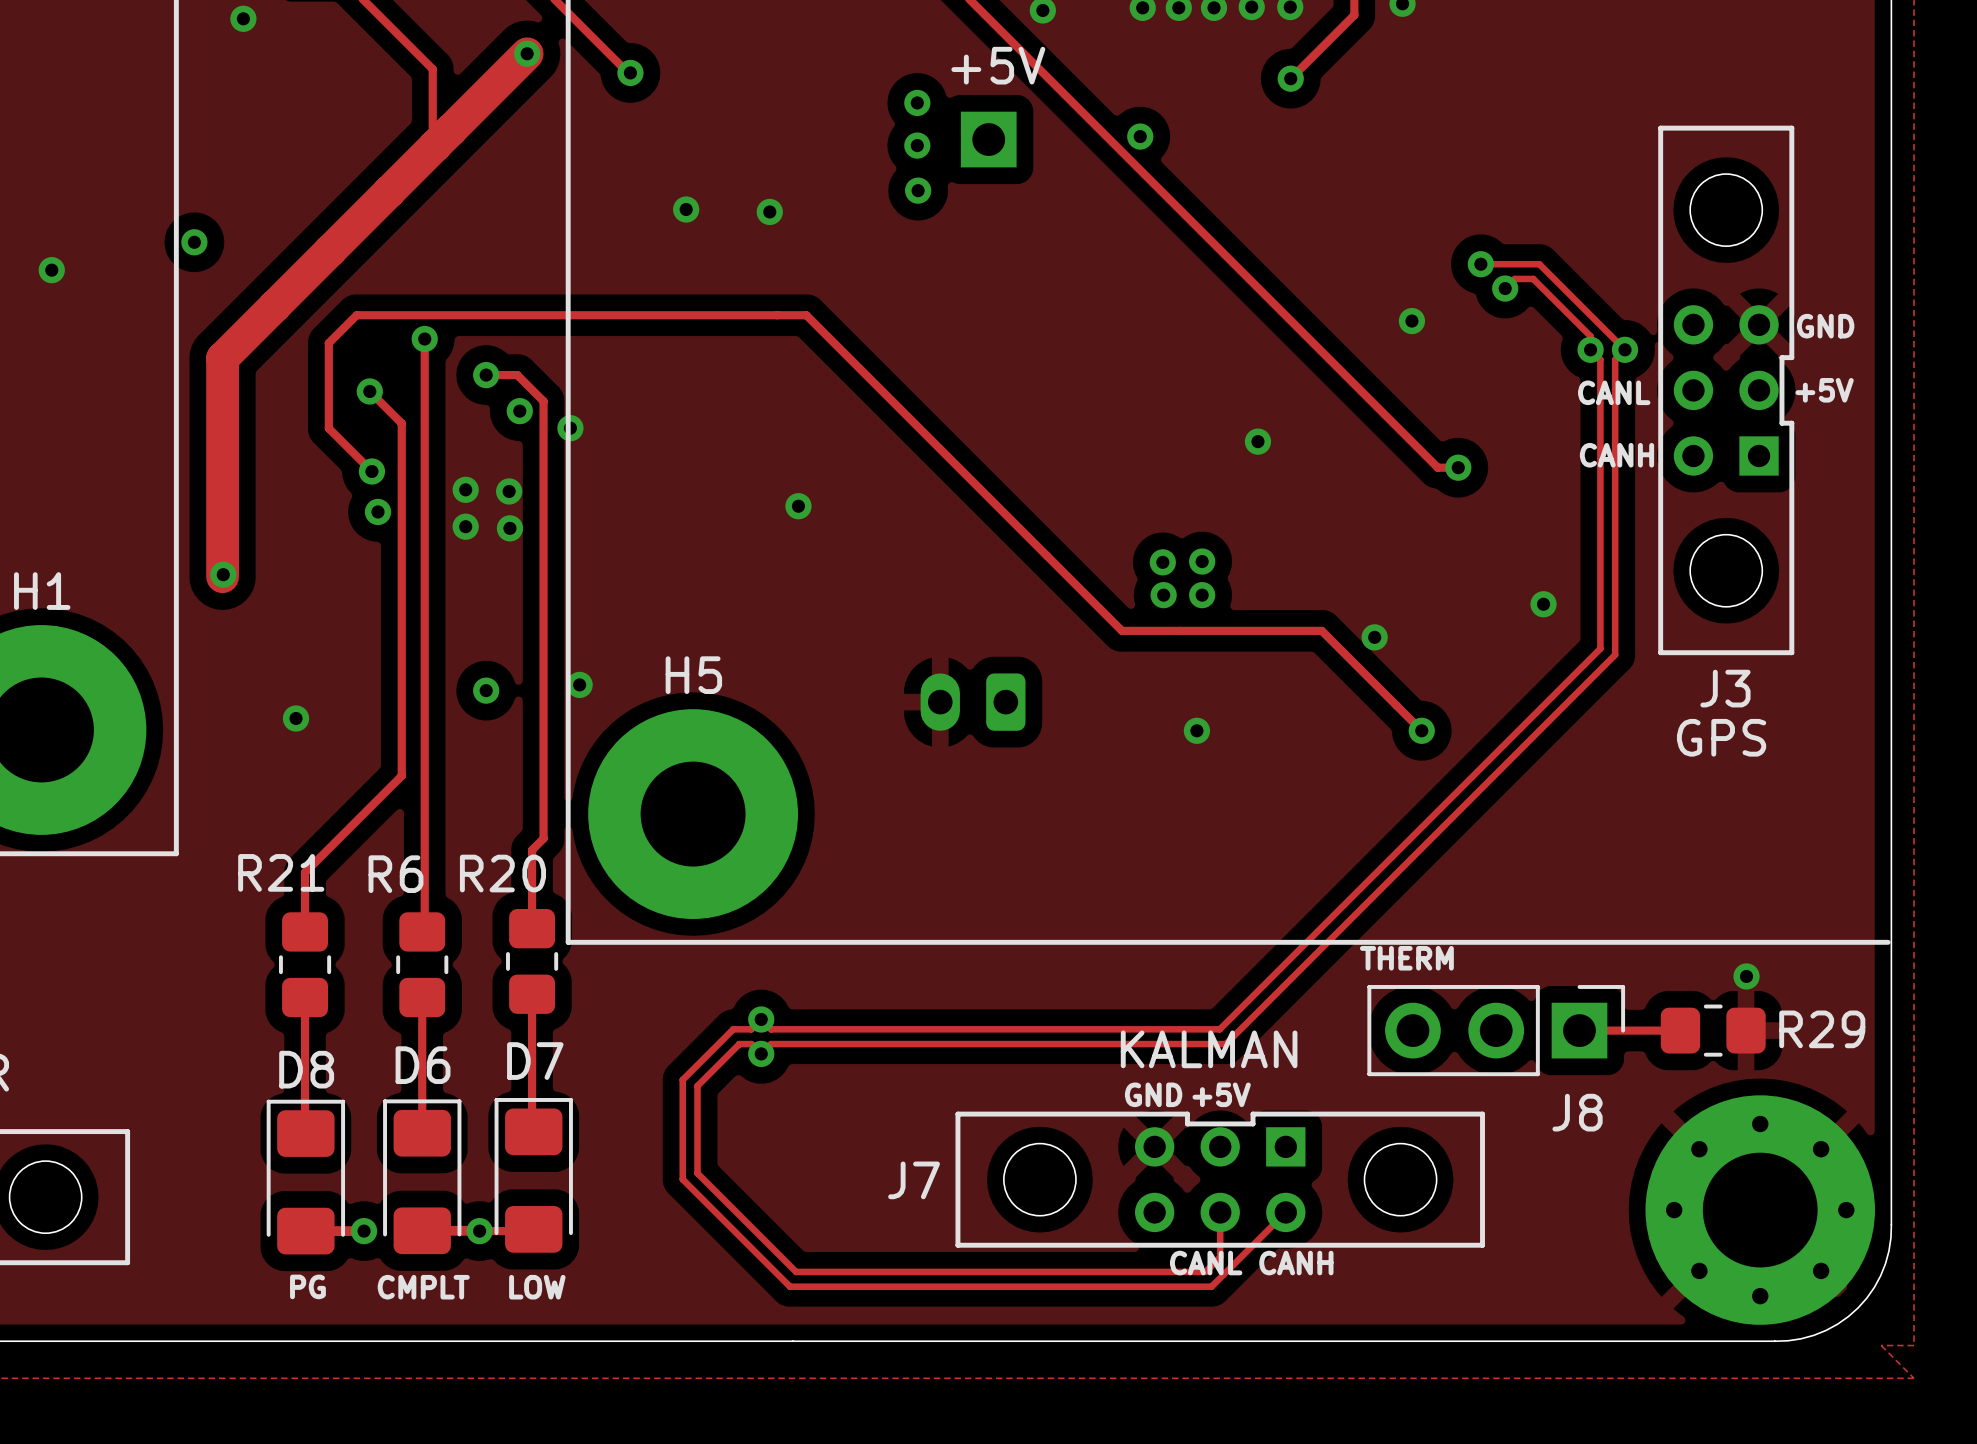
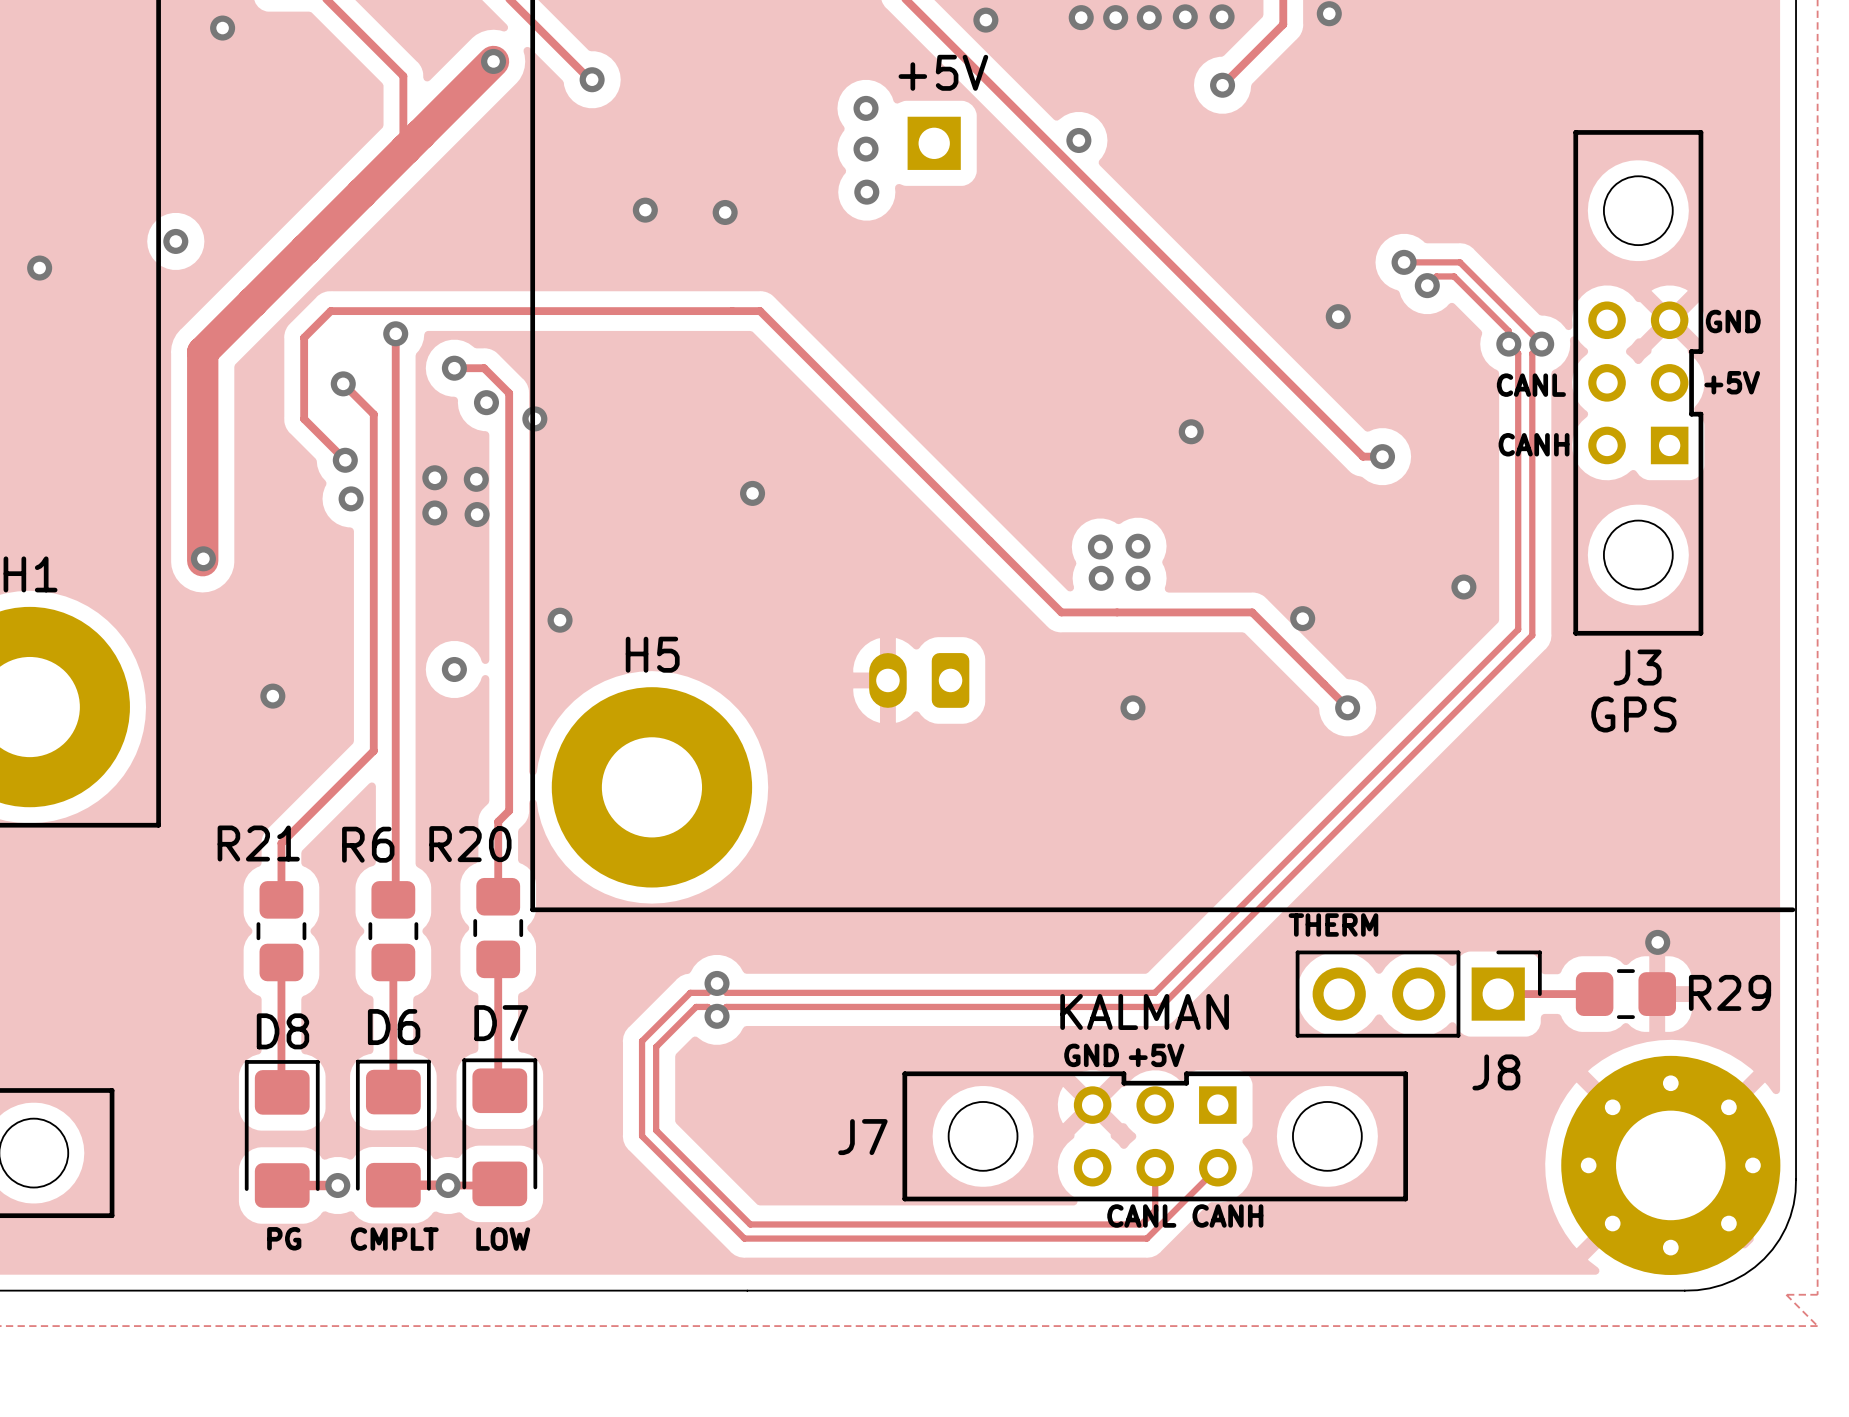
via position: (579, 684) -> (560, 620)

